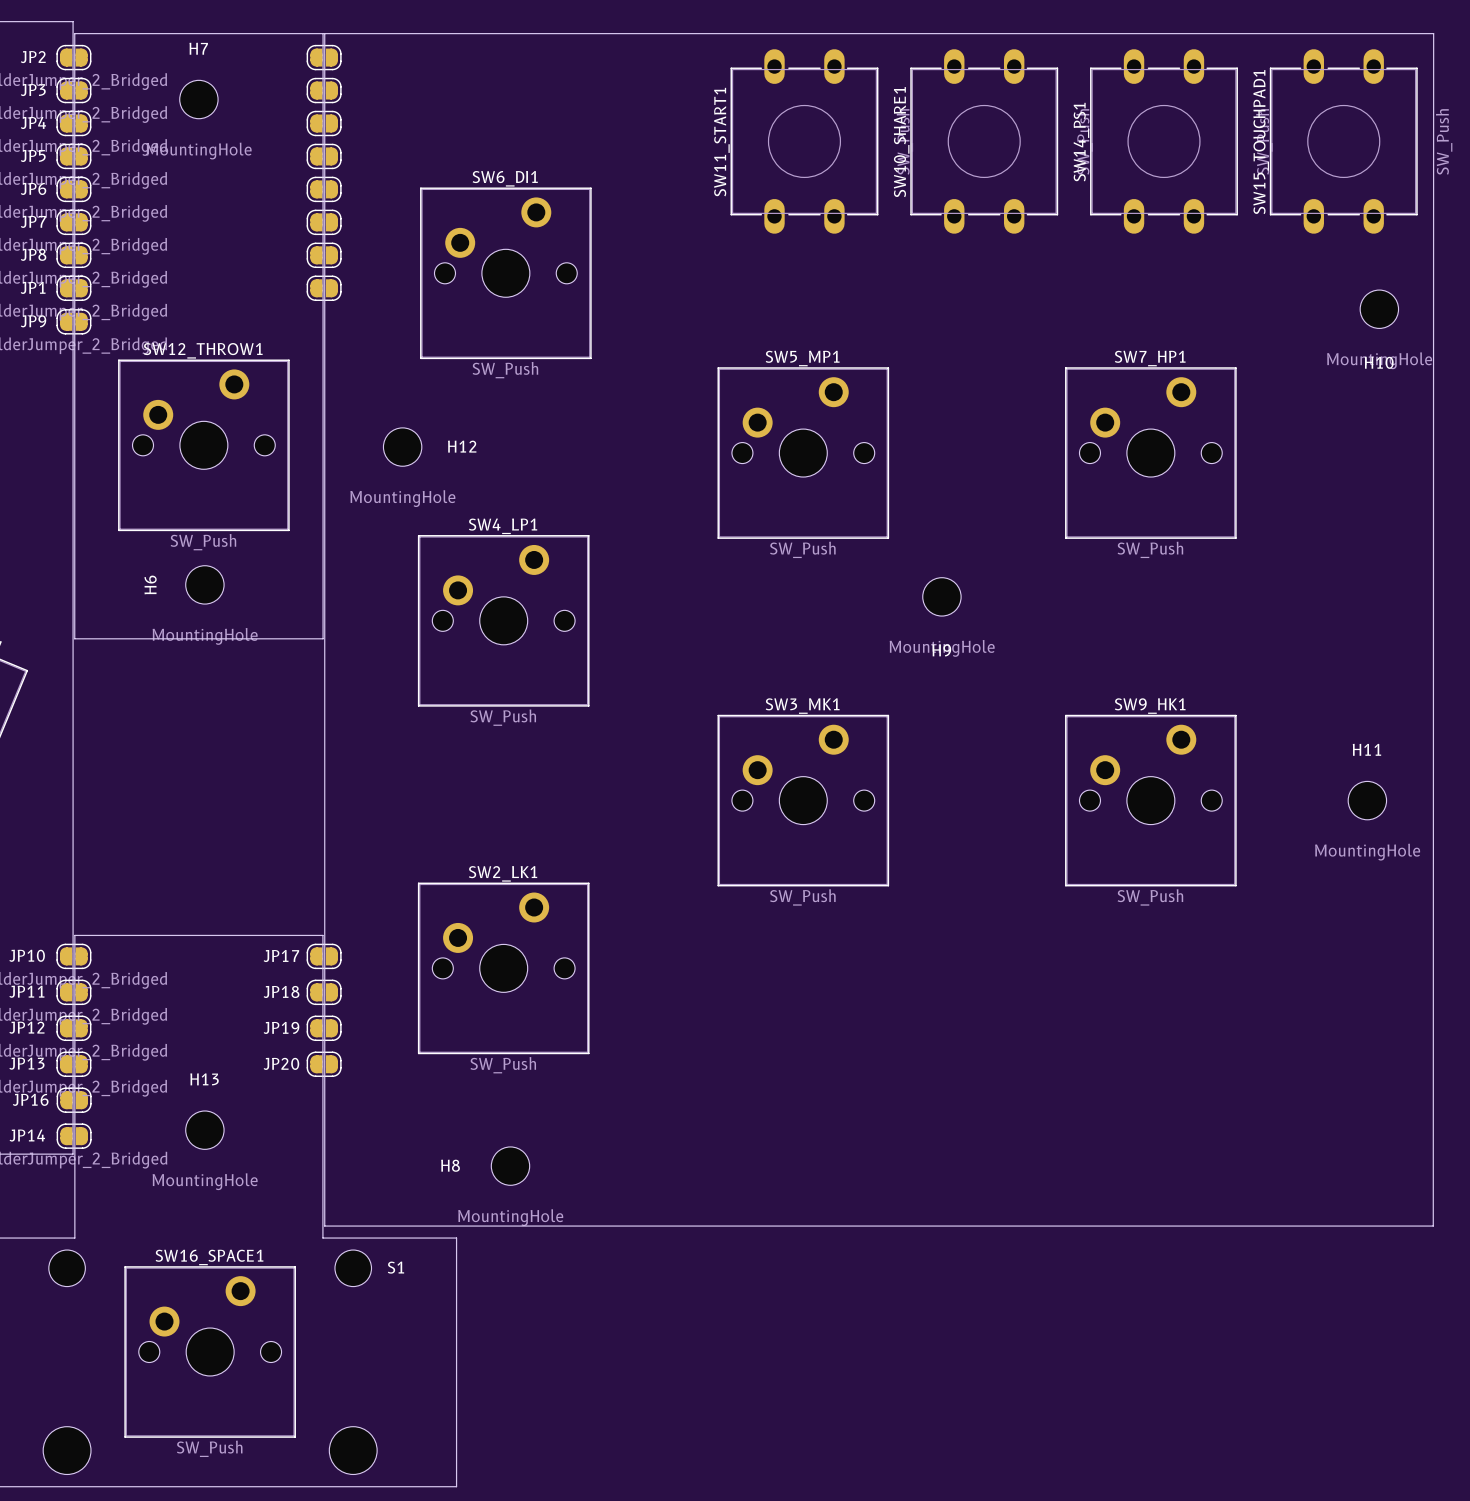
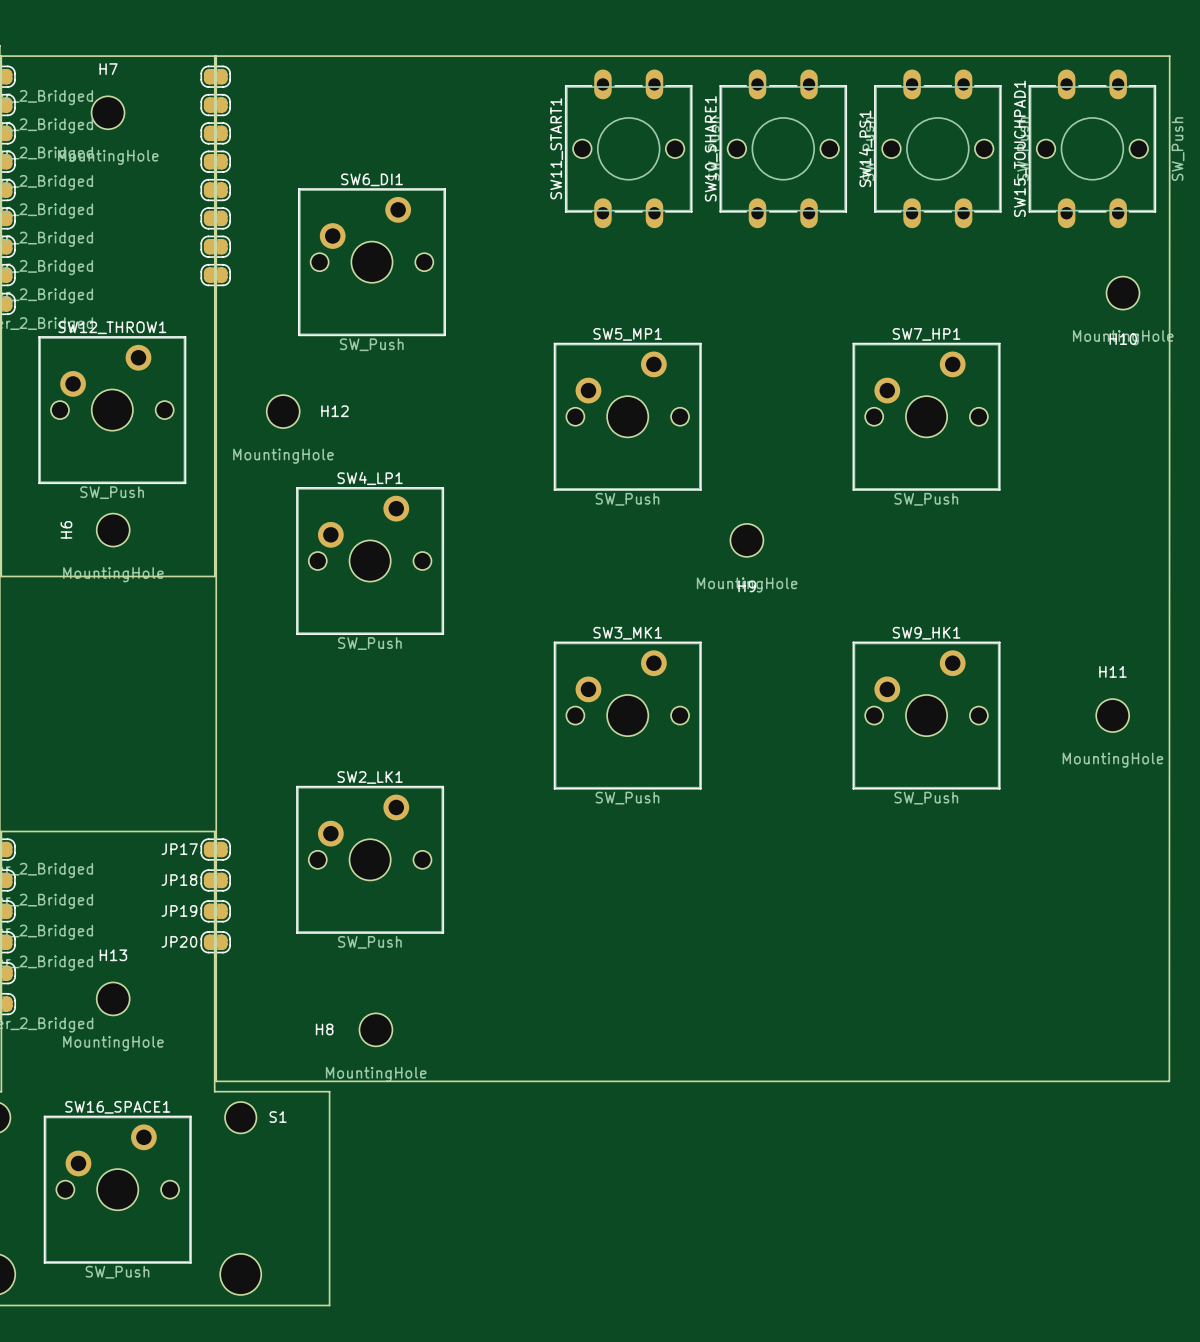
SW11_START1 footprint: [730, 49, 879, 234] -> [565, 69, 693, 229]
SW10_SHARE1 footprint: [910, 49, 1059, 234] -> [719, 69, 847, 229]
SW14_PS1 footprint: [1090, 49, 1238, 234] -> [874, 69, 1002, 229]
SW15_TOUCHPAD1 footprint: [1269, 49, 1418, 234] -> [1028, 69, 1156, 229]

